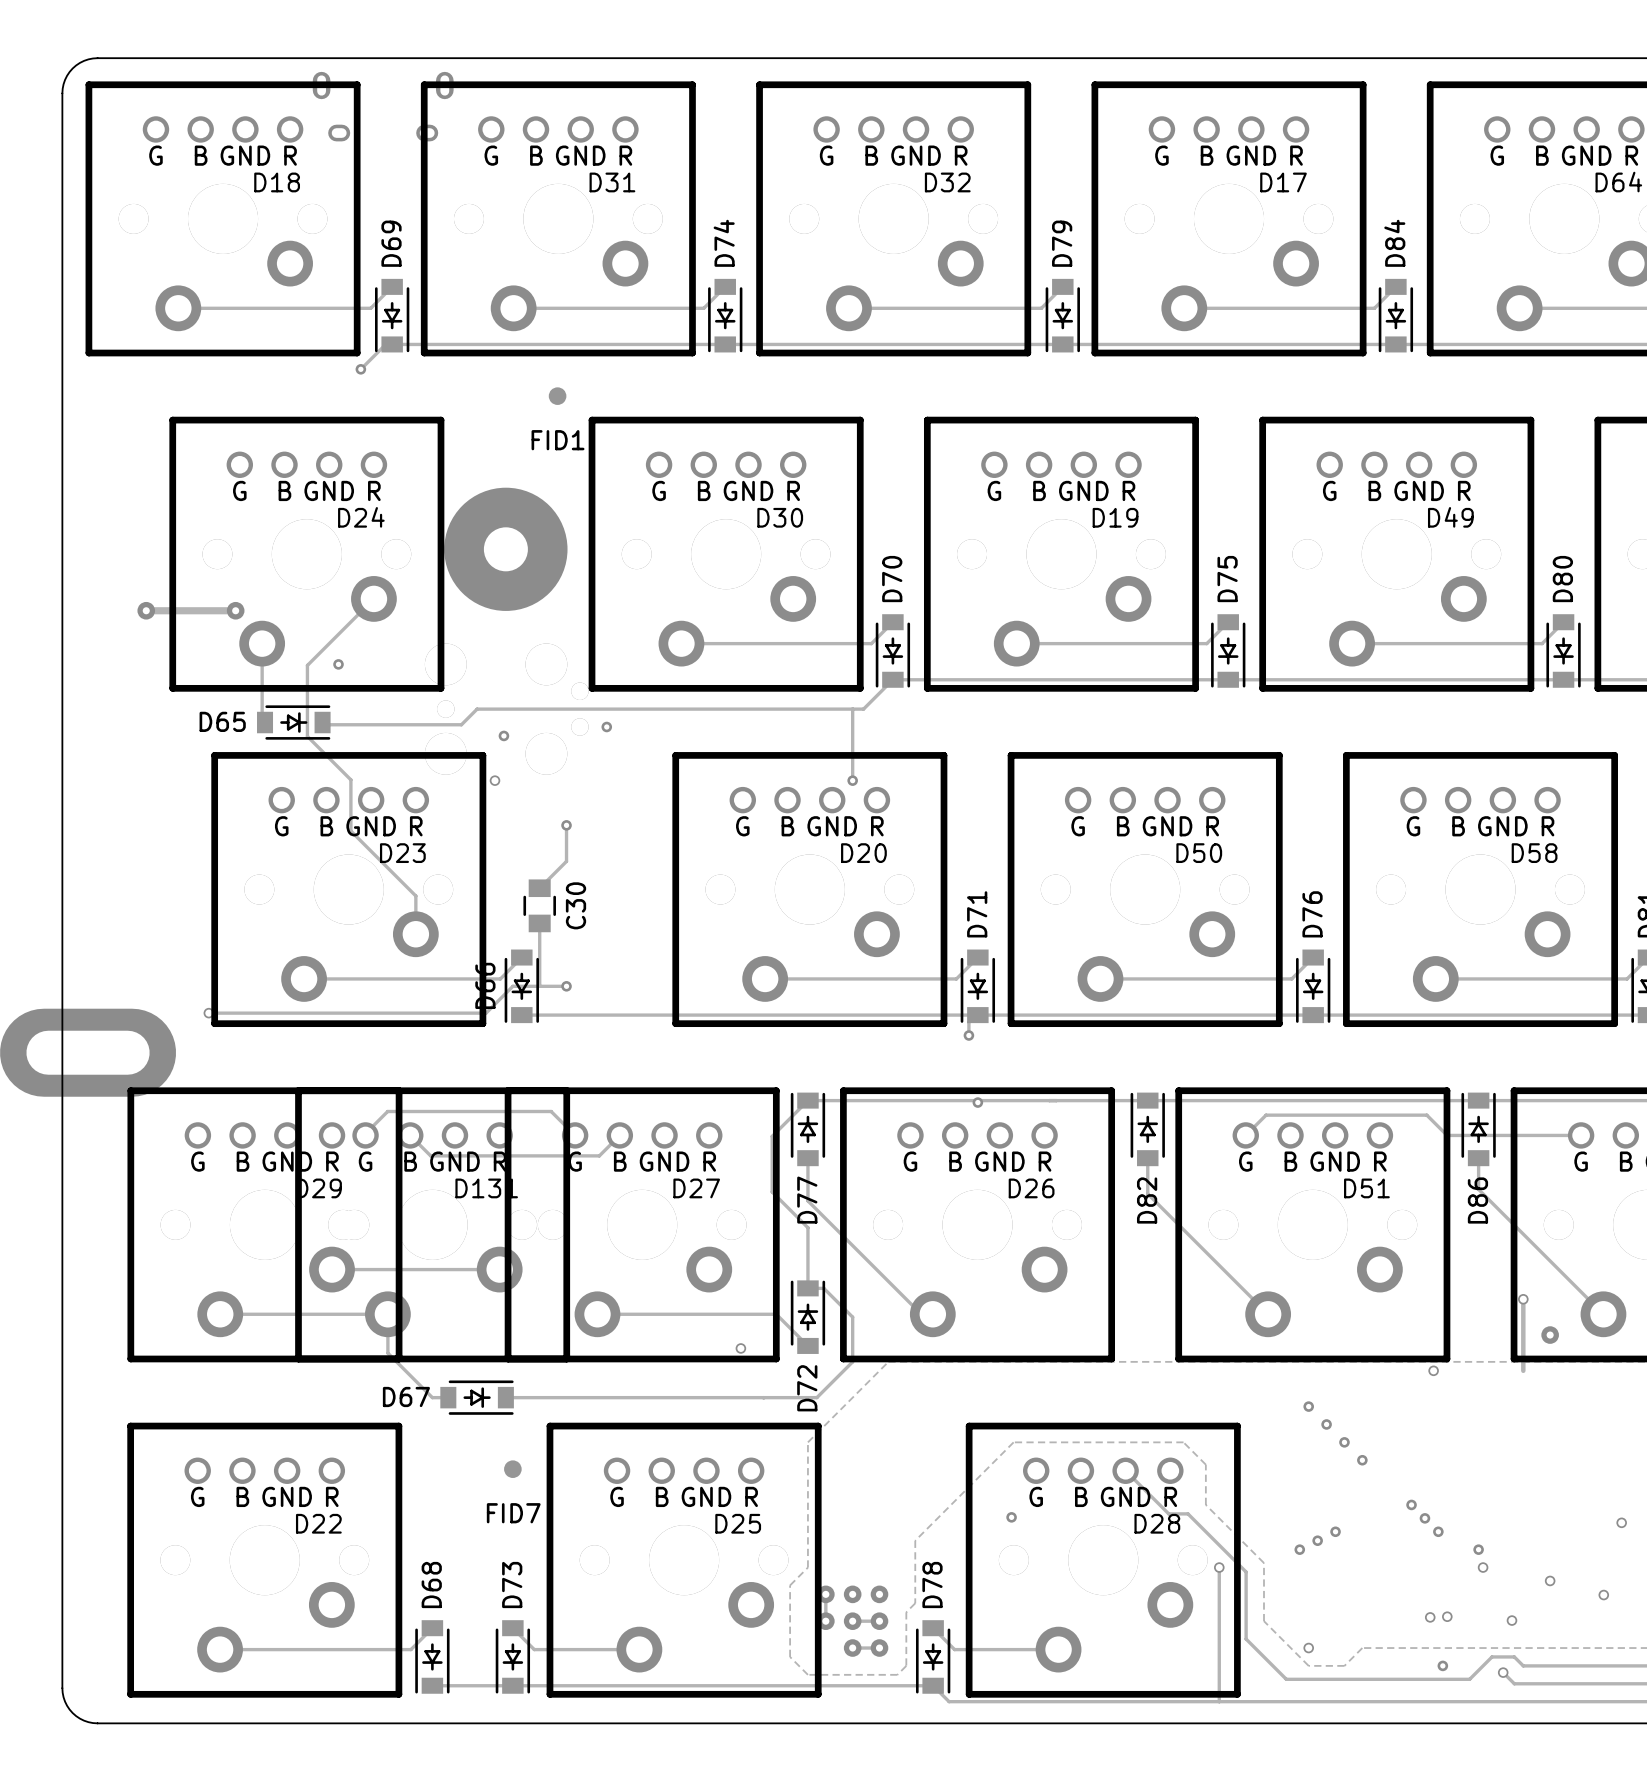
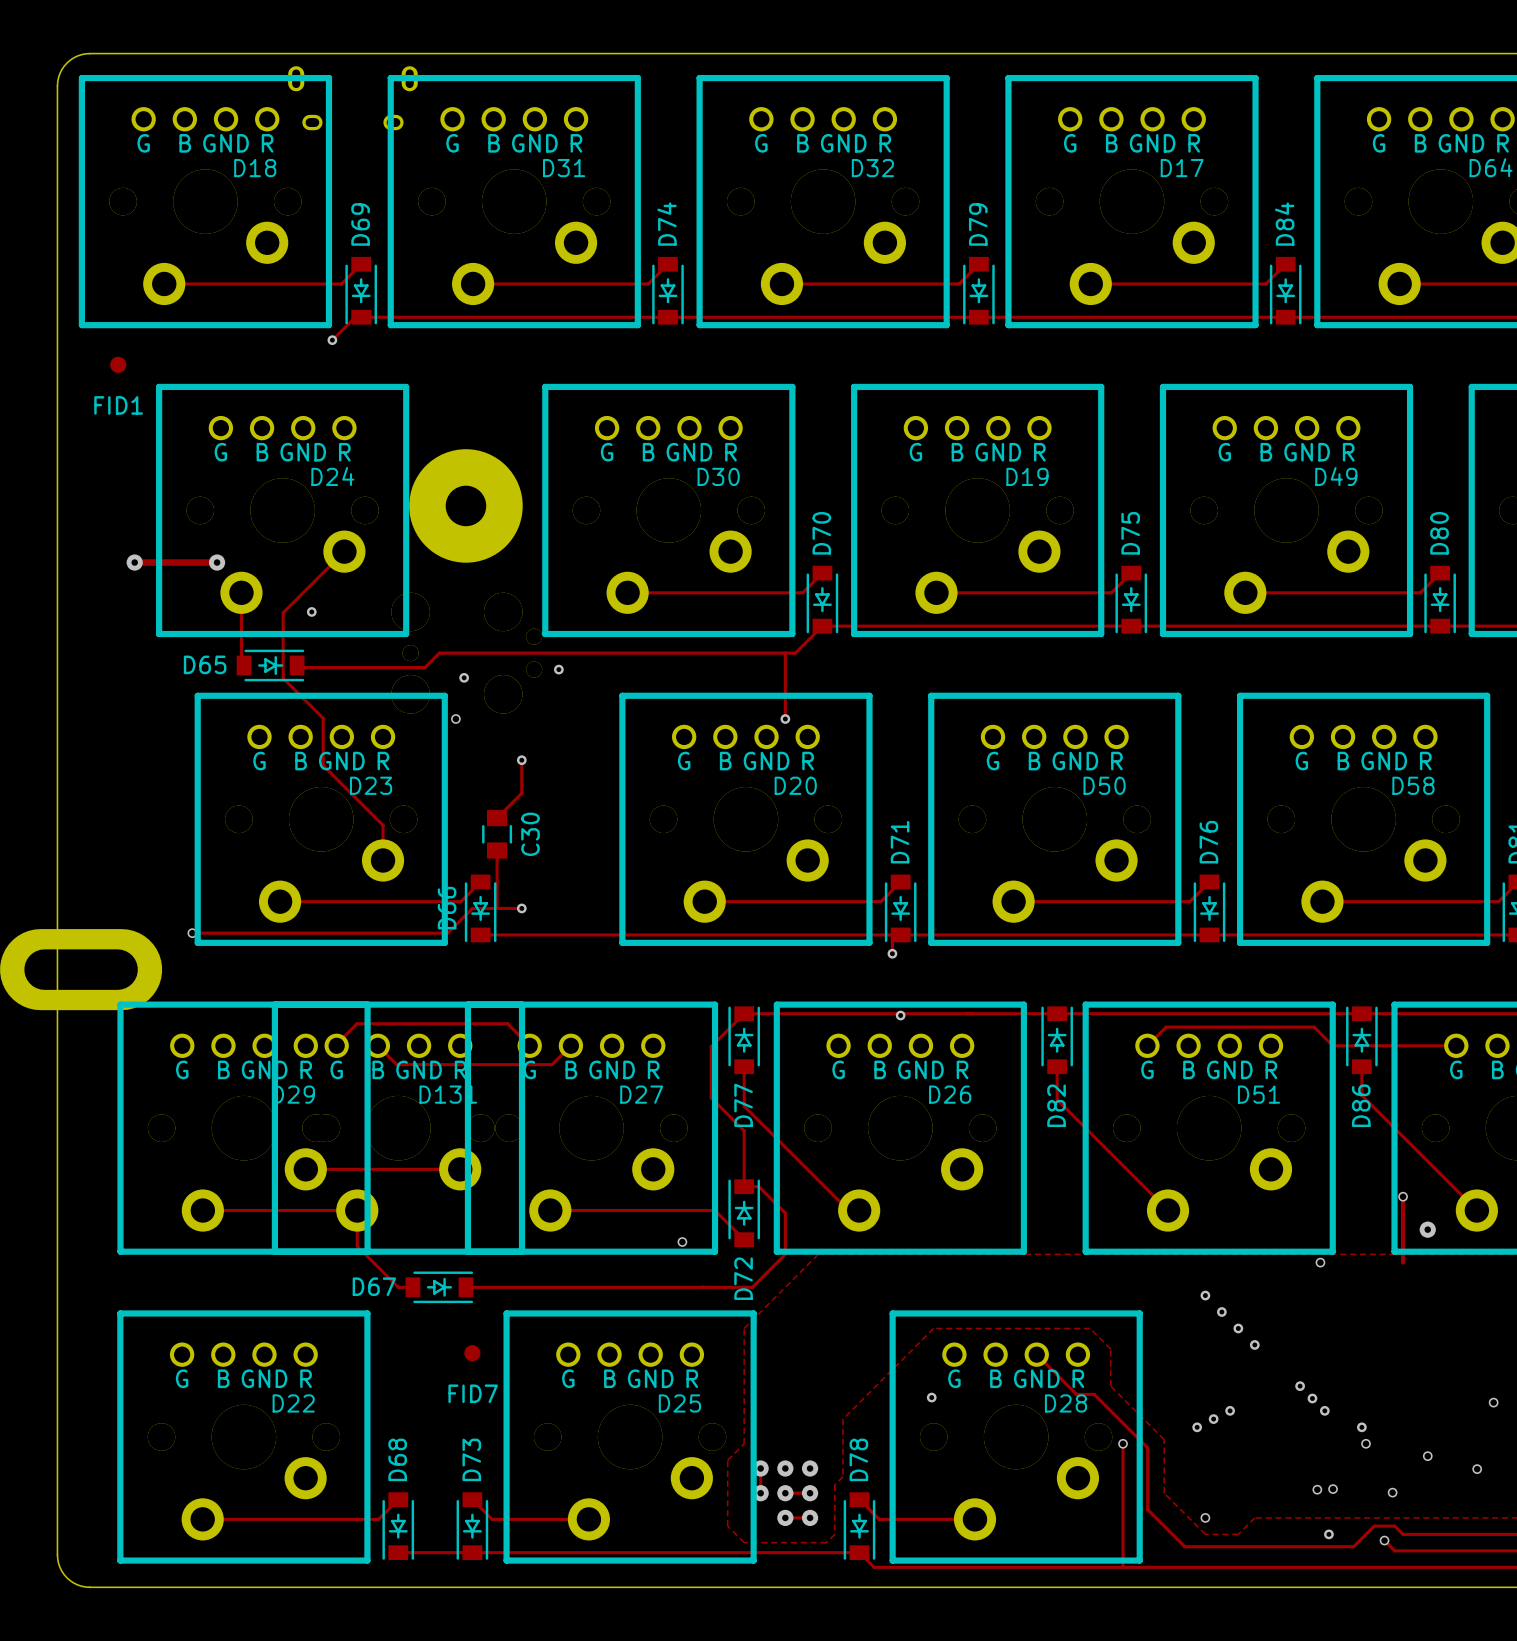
FID1 position: (557, 396) -> (118, 364)

